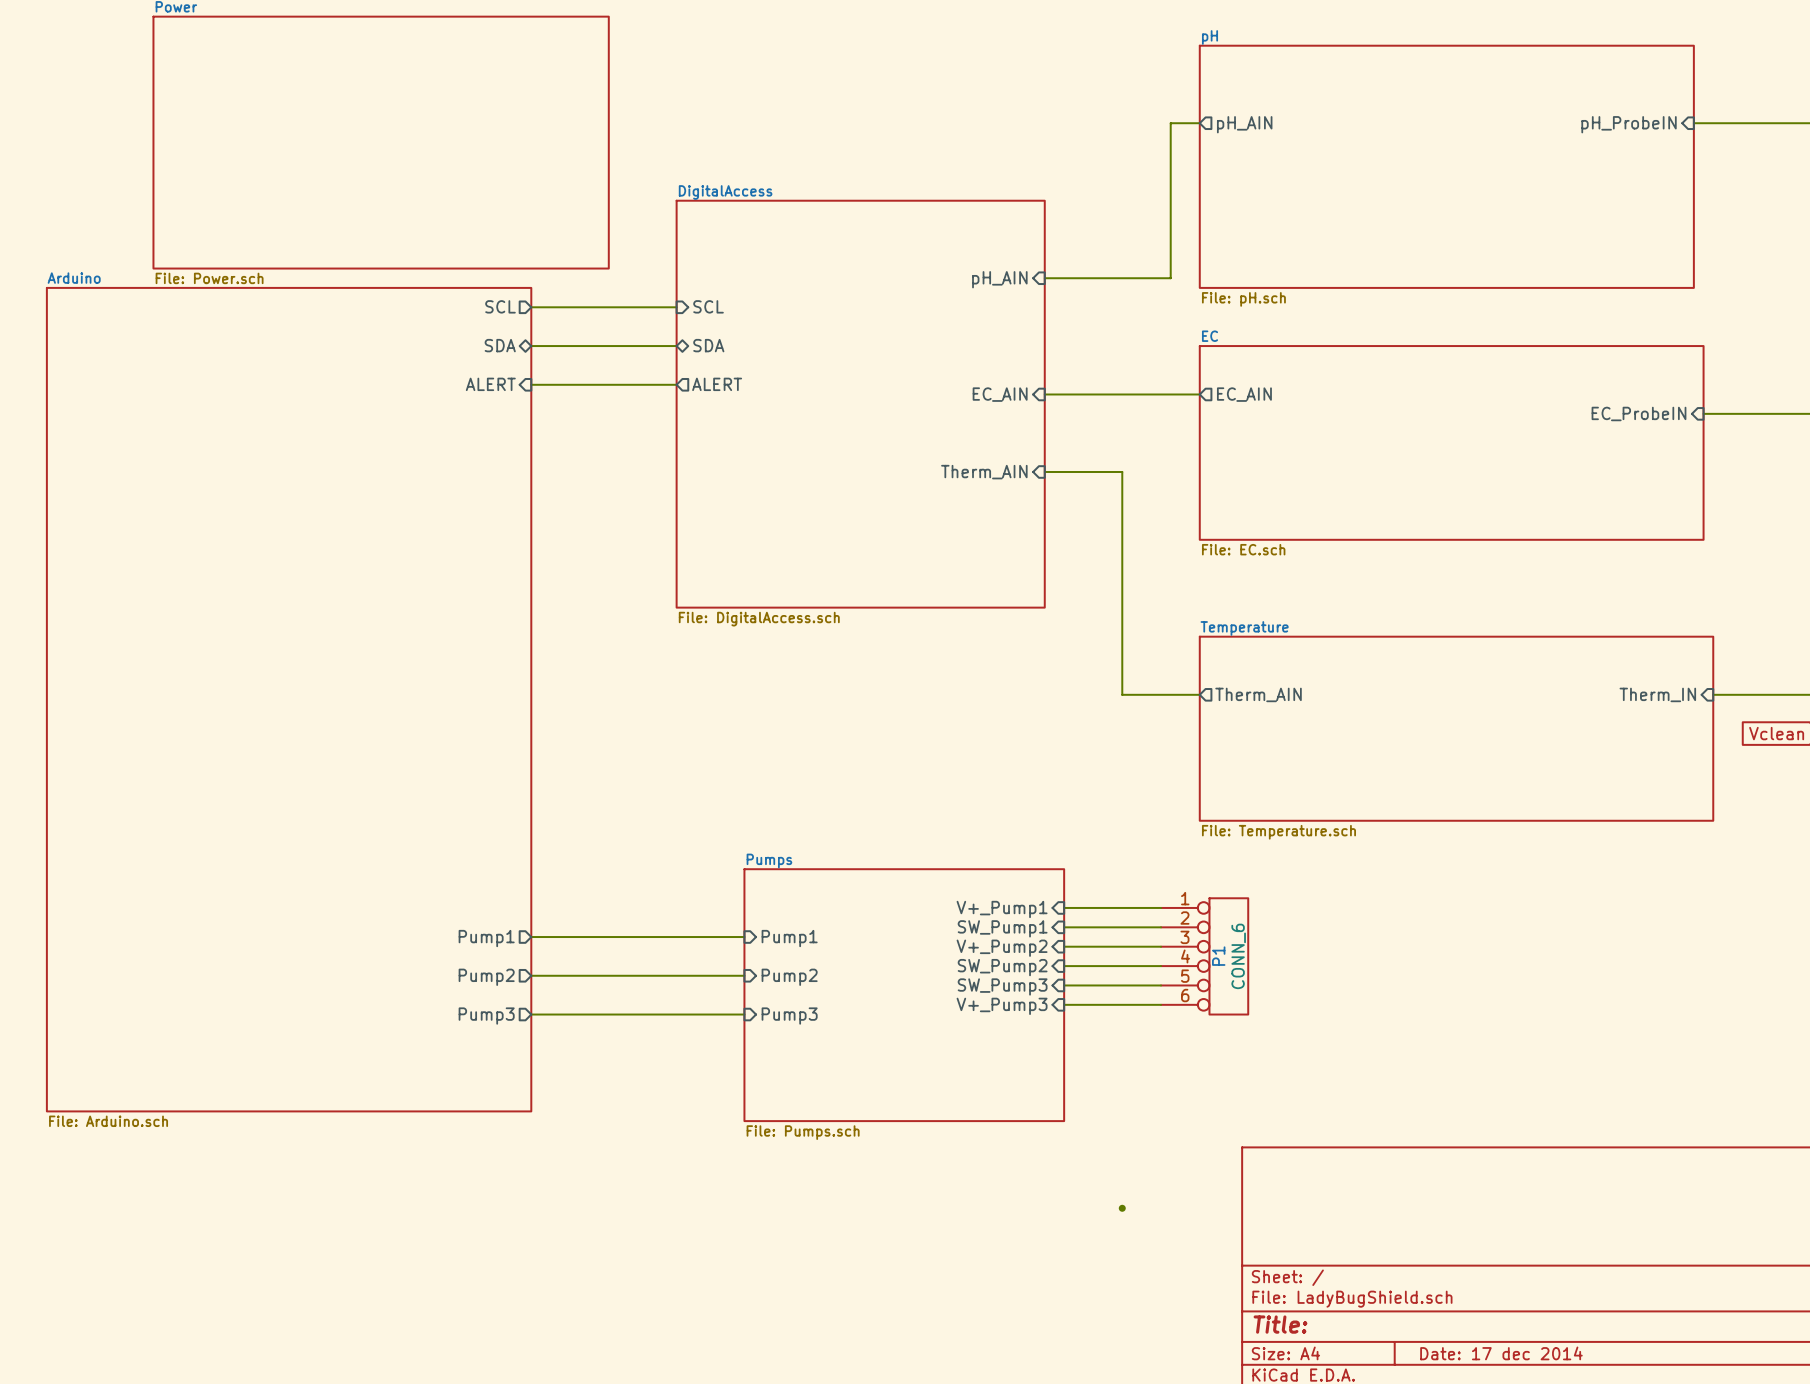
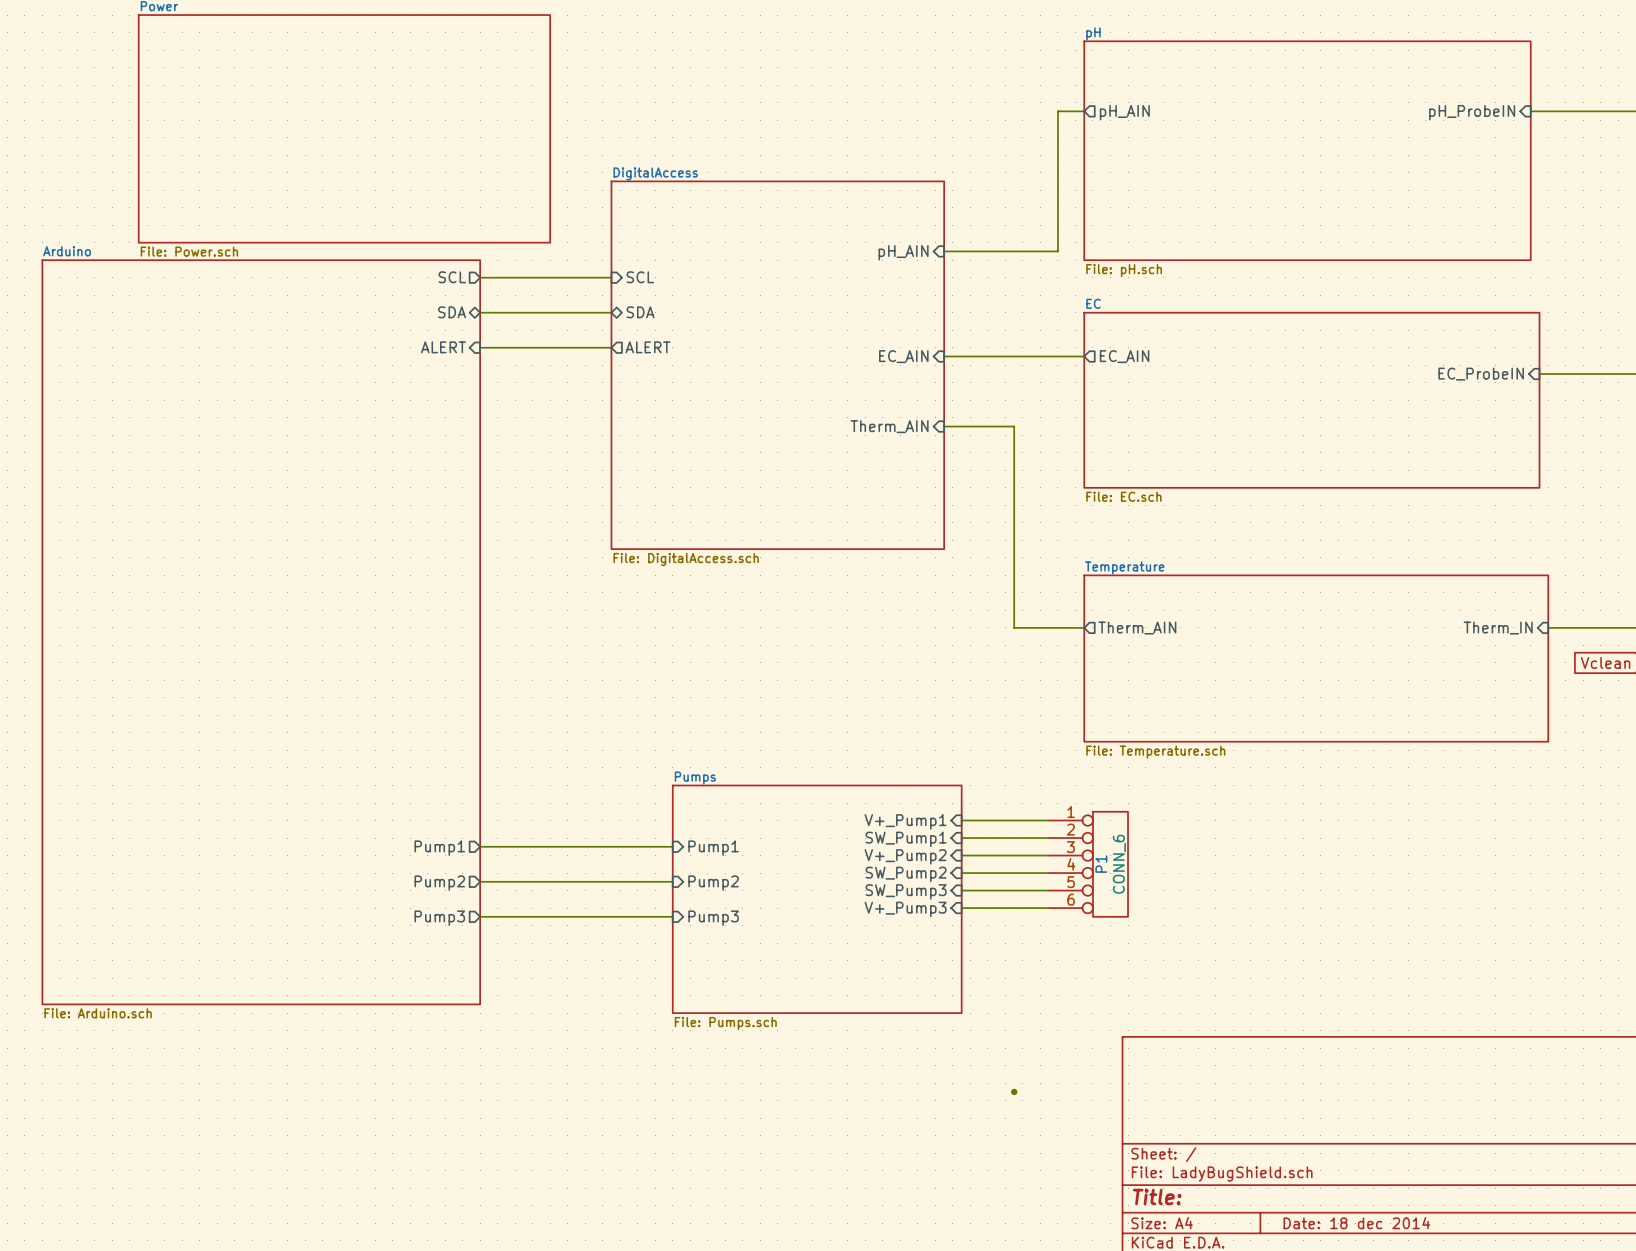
title block: Date: 17 dec 2014 (1501, 1353) -> Date: 18 dec 2014 (1356, 1223)

